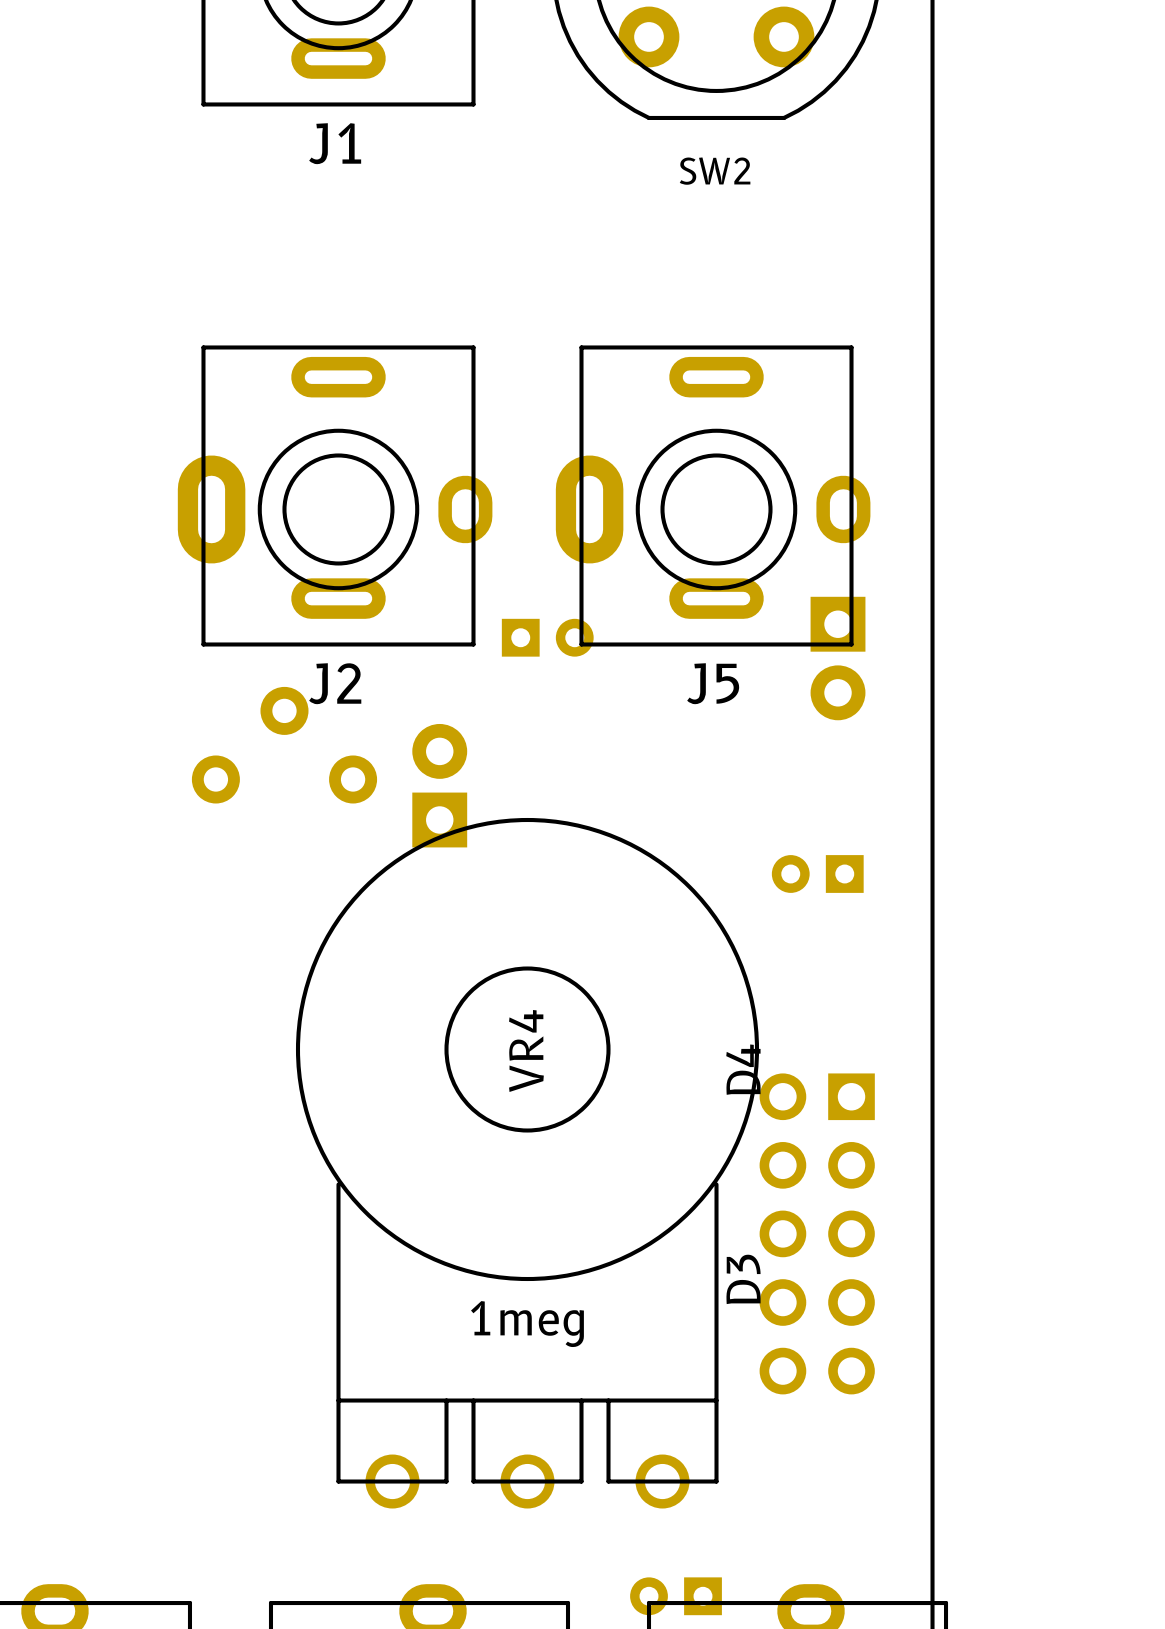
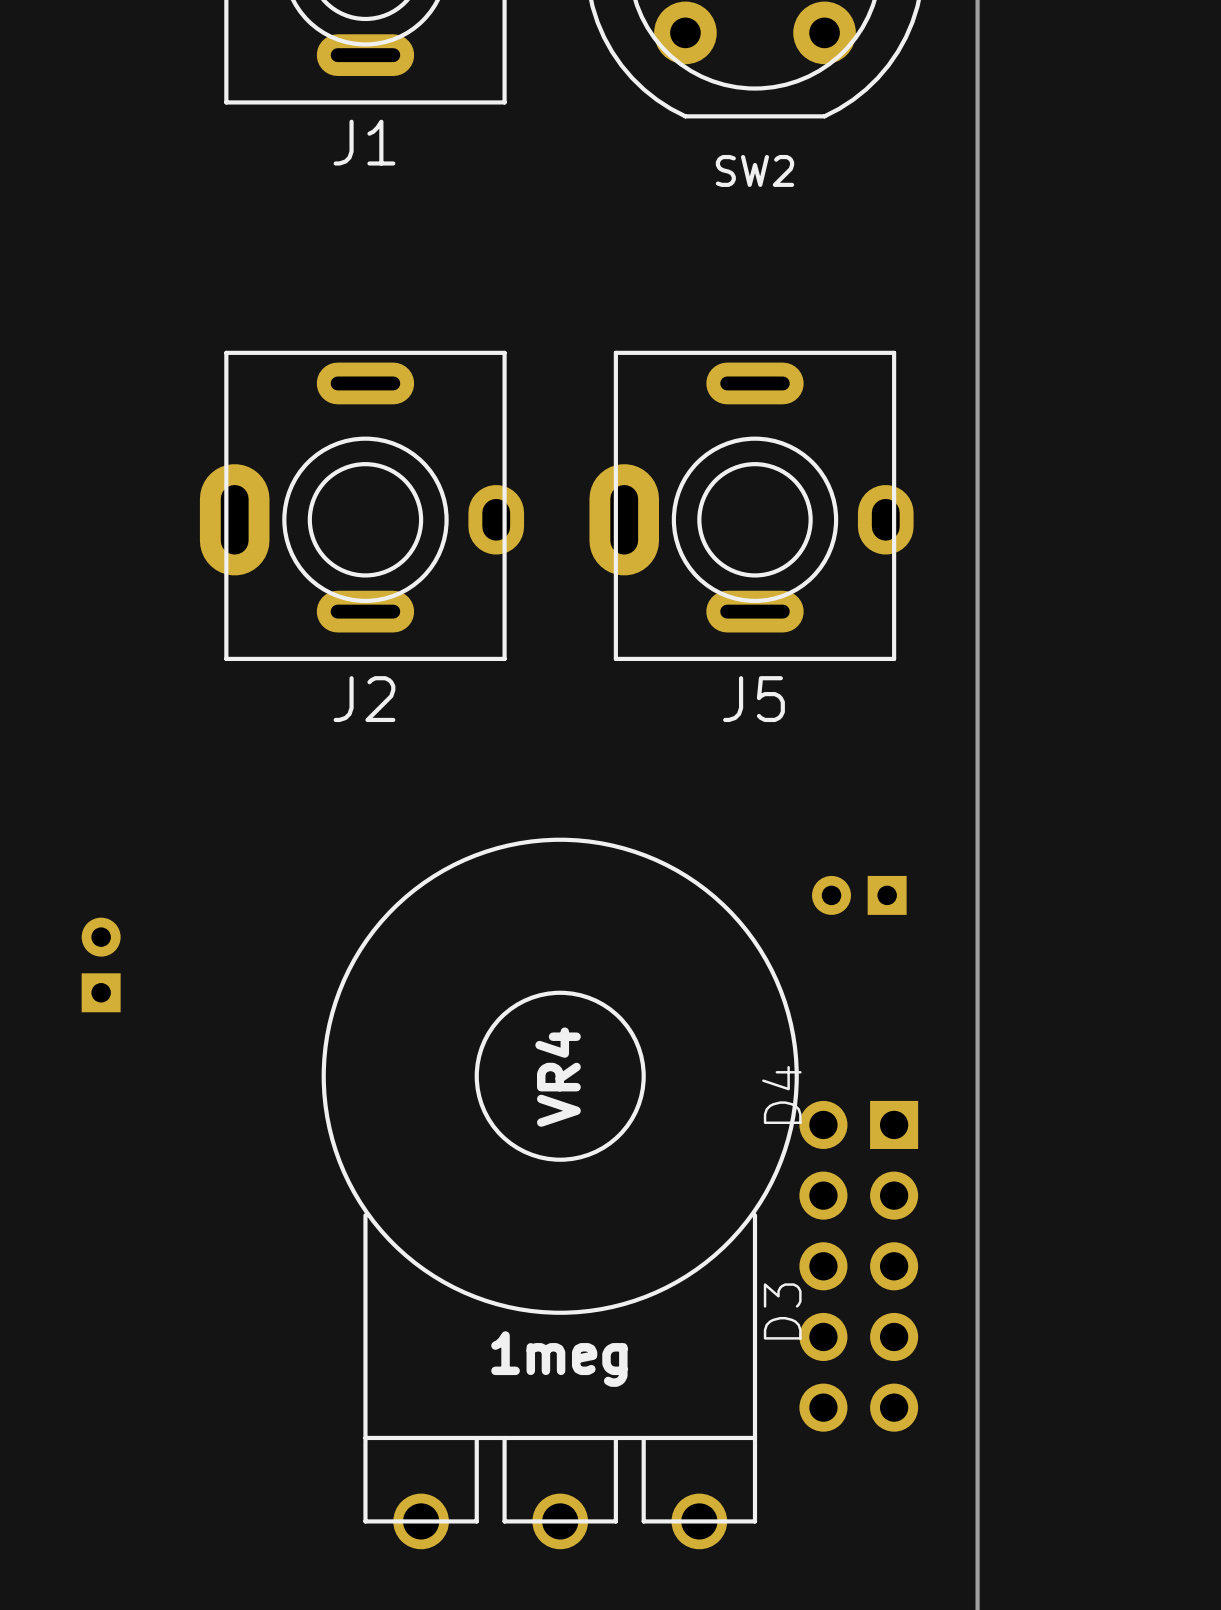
part rotation: 0° (547, 637) -> 90° counterclockwise (101, 964)
part position: (547, 637) -> (101, 964)
part: (838, 658) -> none
part: (284, 745) -> none
part: (439, 785) -> none

